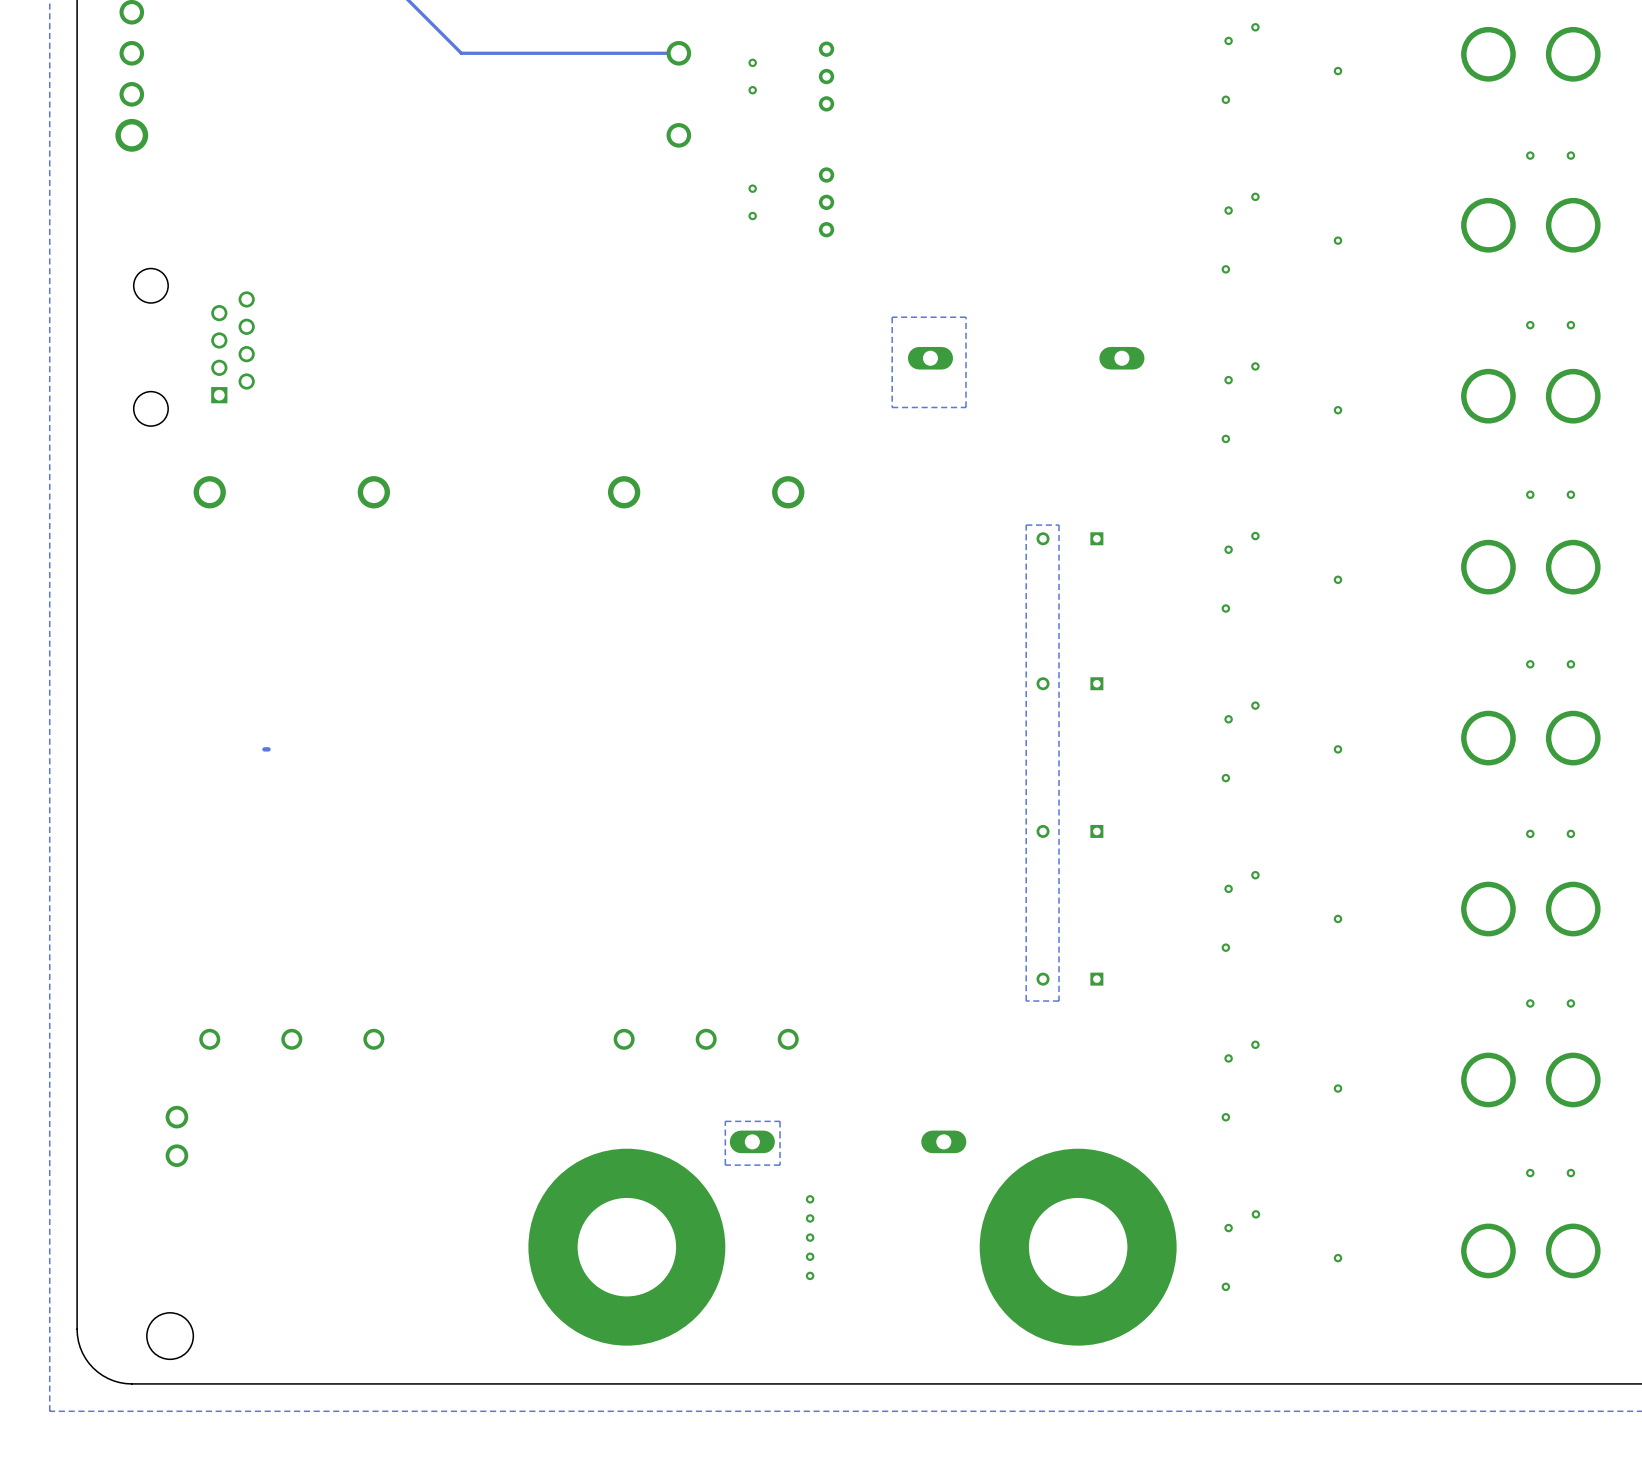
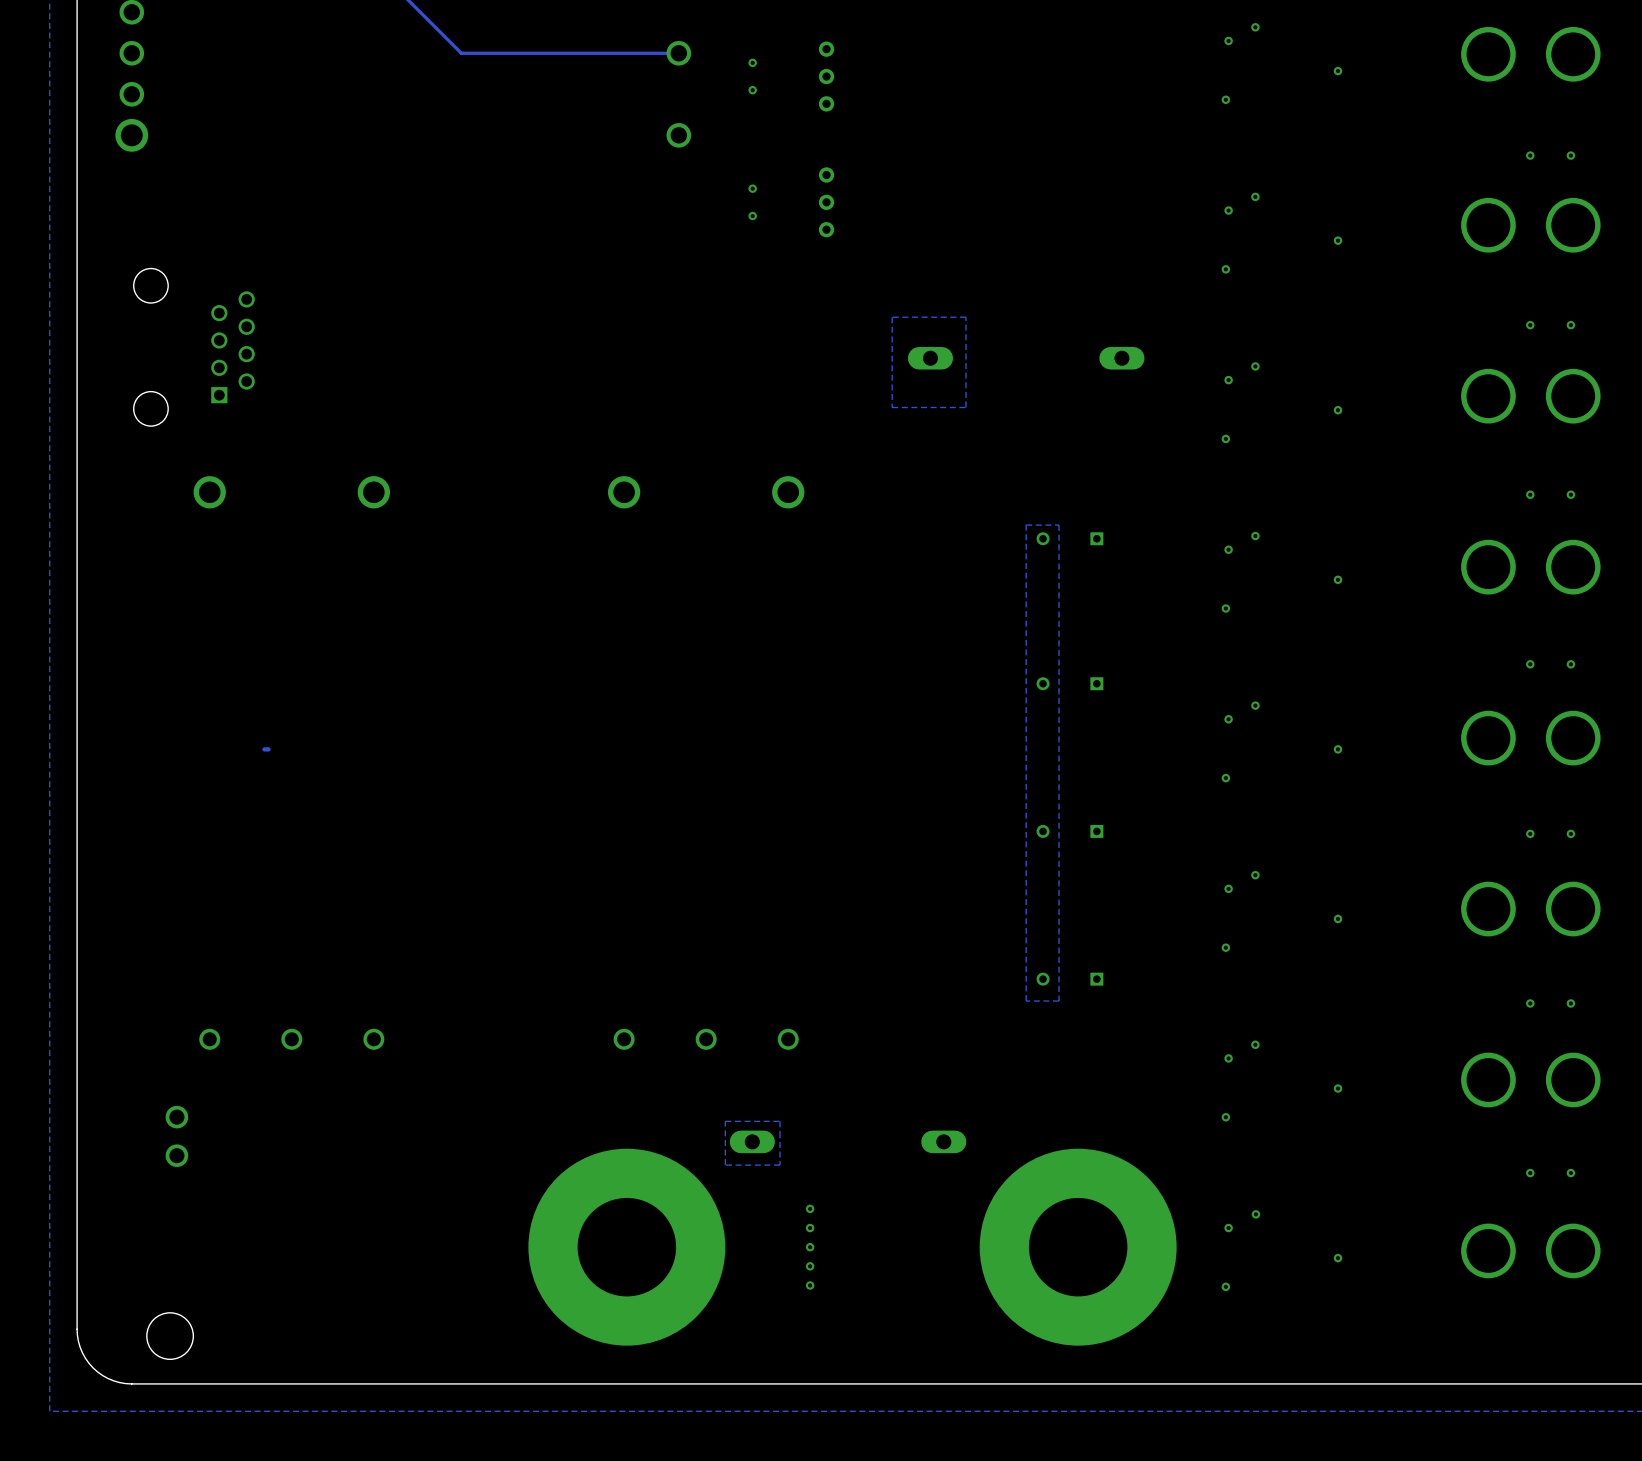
via: (810, 1199) -> none
via: none -> (810, 1208)
via: (810, 1218) -> none
via: none -> (810, 1228)
via: (810, 1237) -> none
via: none -> (810, 1247)
via: (810, 1256) -> none
via: none -> (810, 1266)
via: (810, 1275) -> none
via: none -> (810, 1285)

